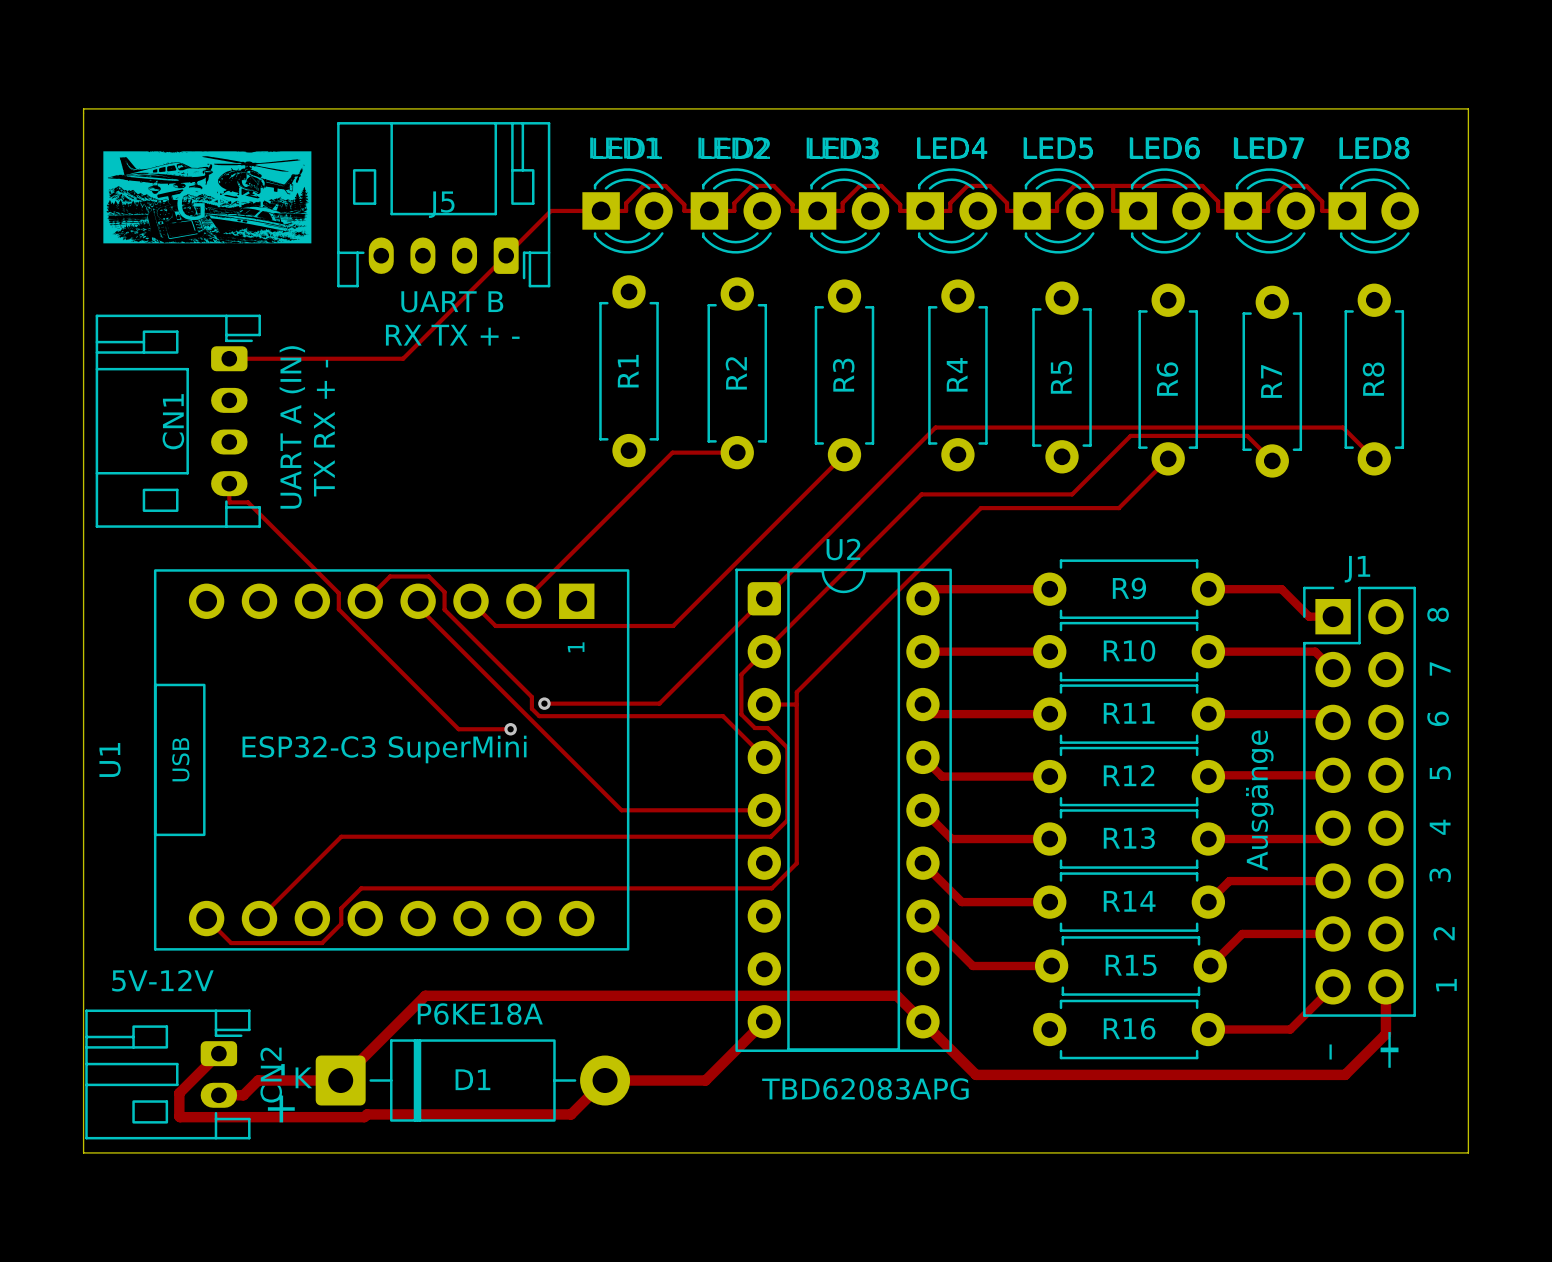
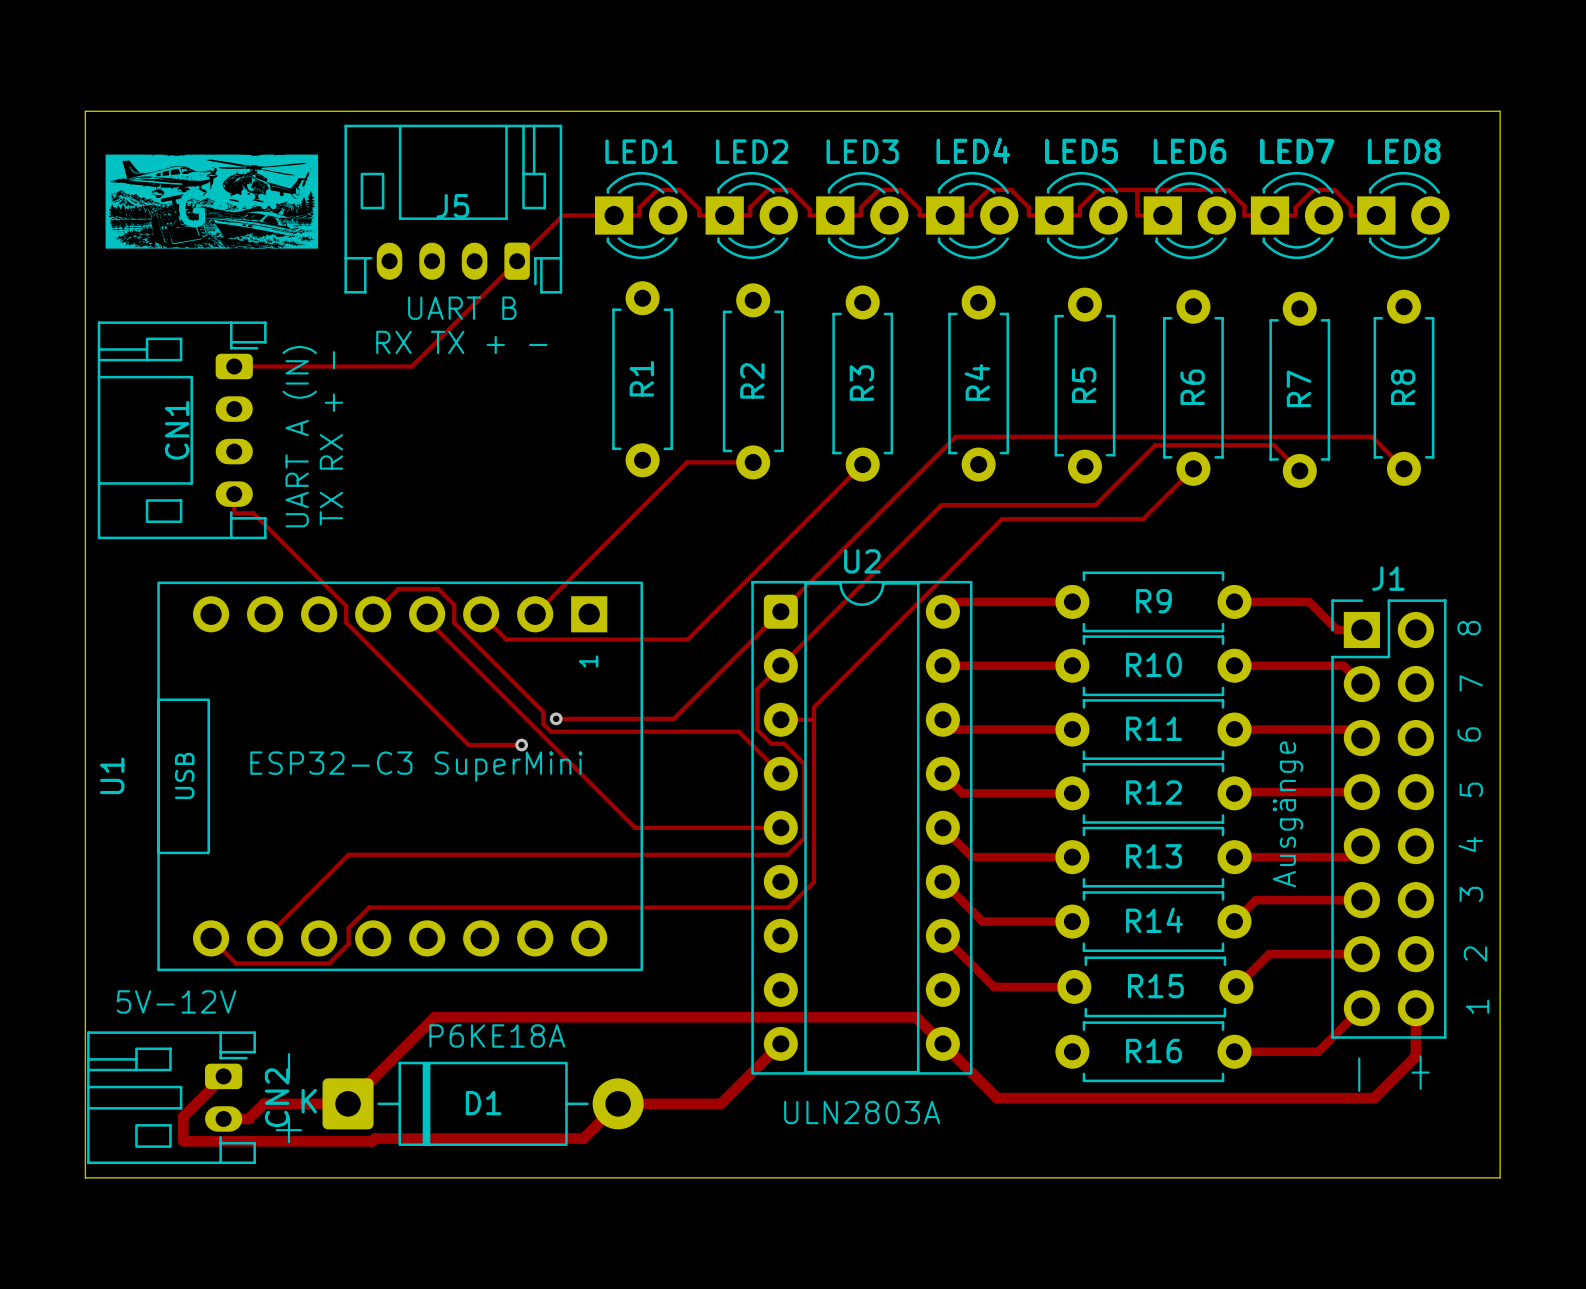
text: TBD62083APG (865, 1089) -> ULN2803A (862, 1112)

